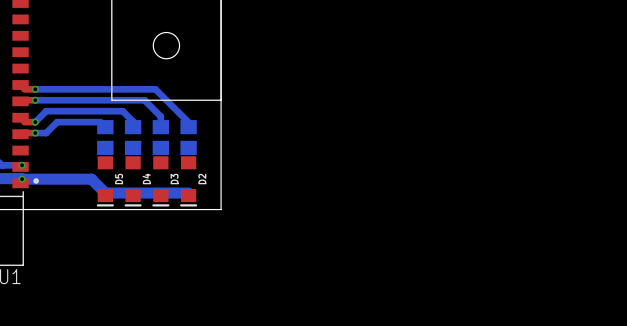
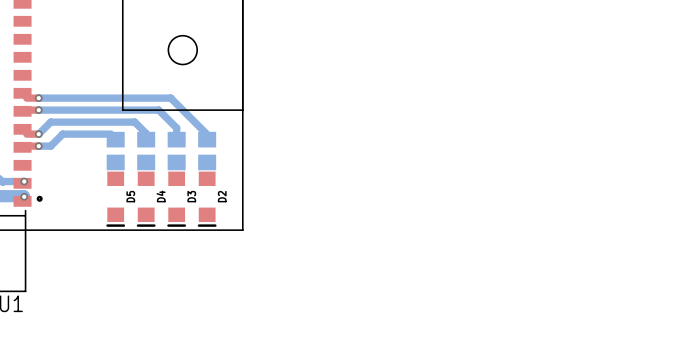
bottom track: (22, 179) (91, 179) (105, 193) (188, 193) -> none

